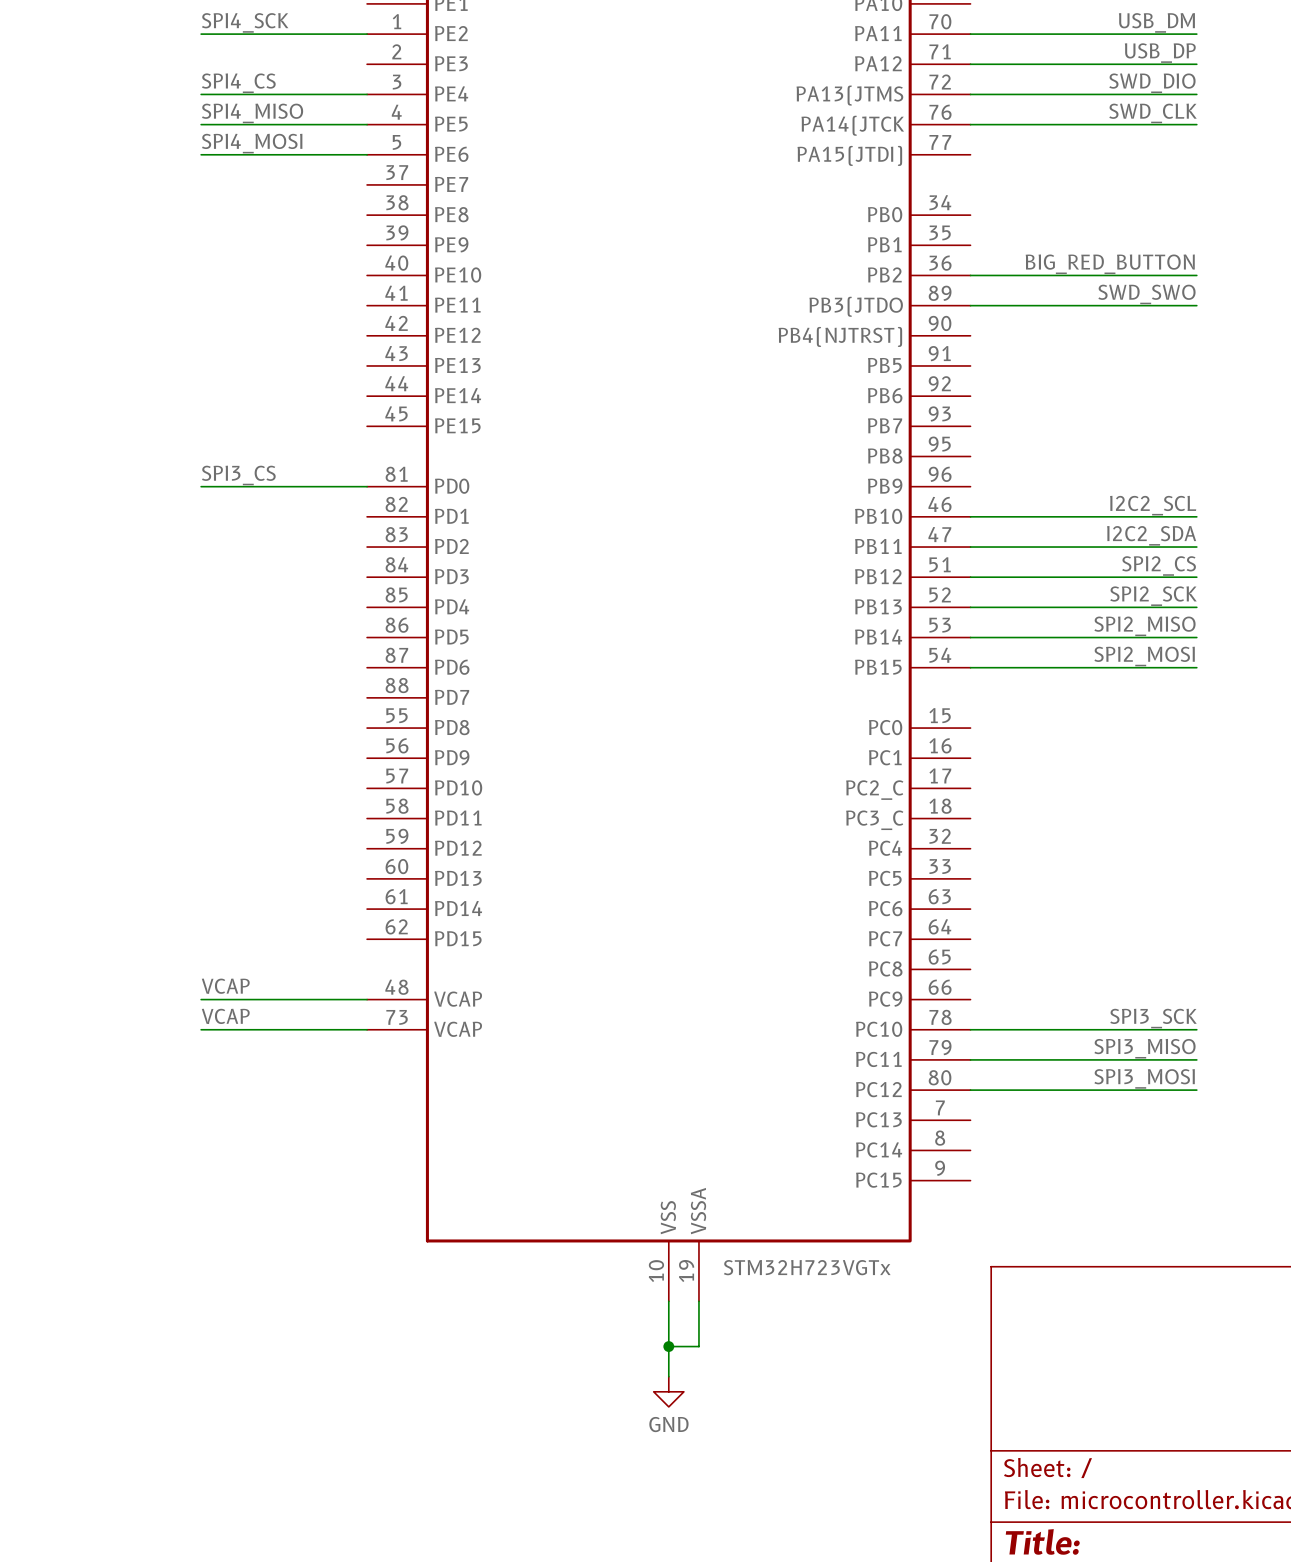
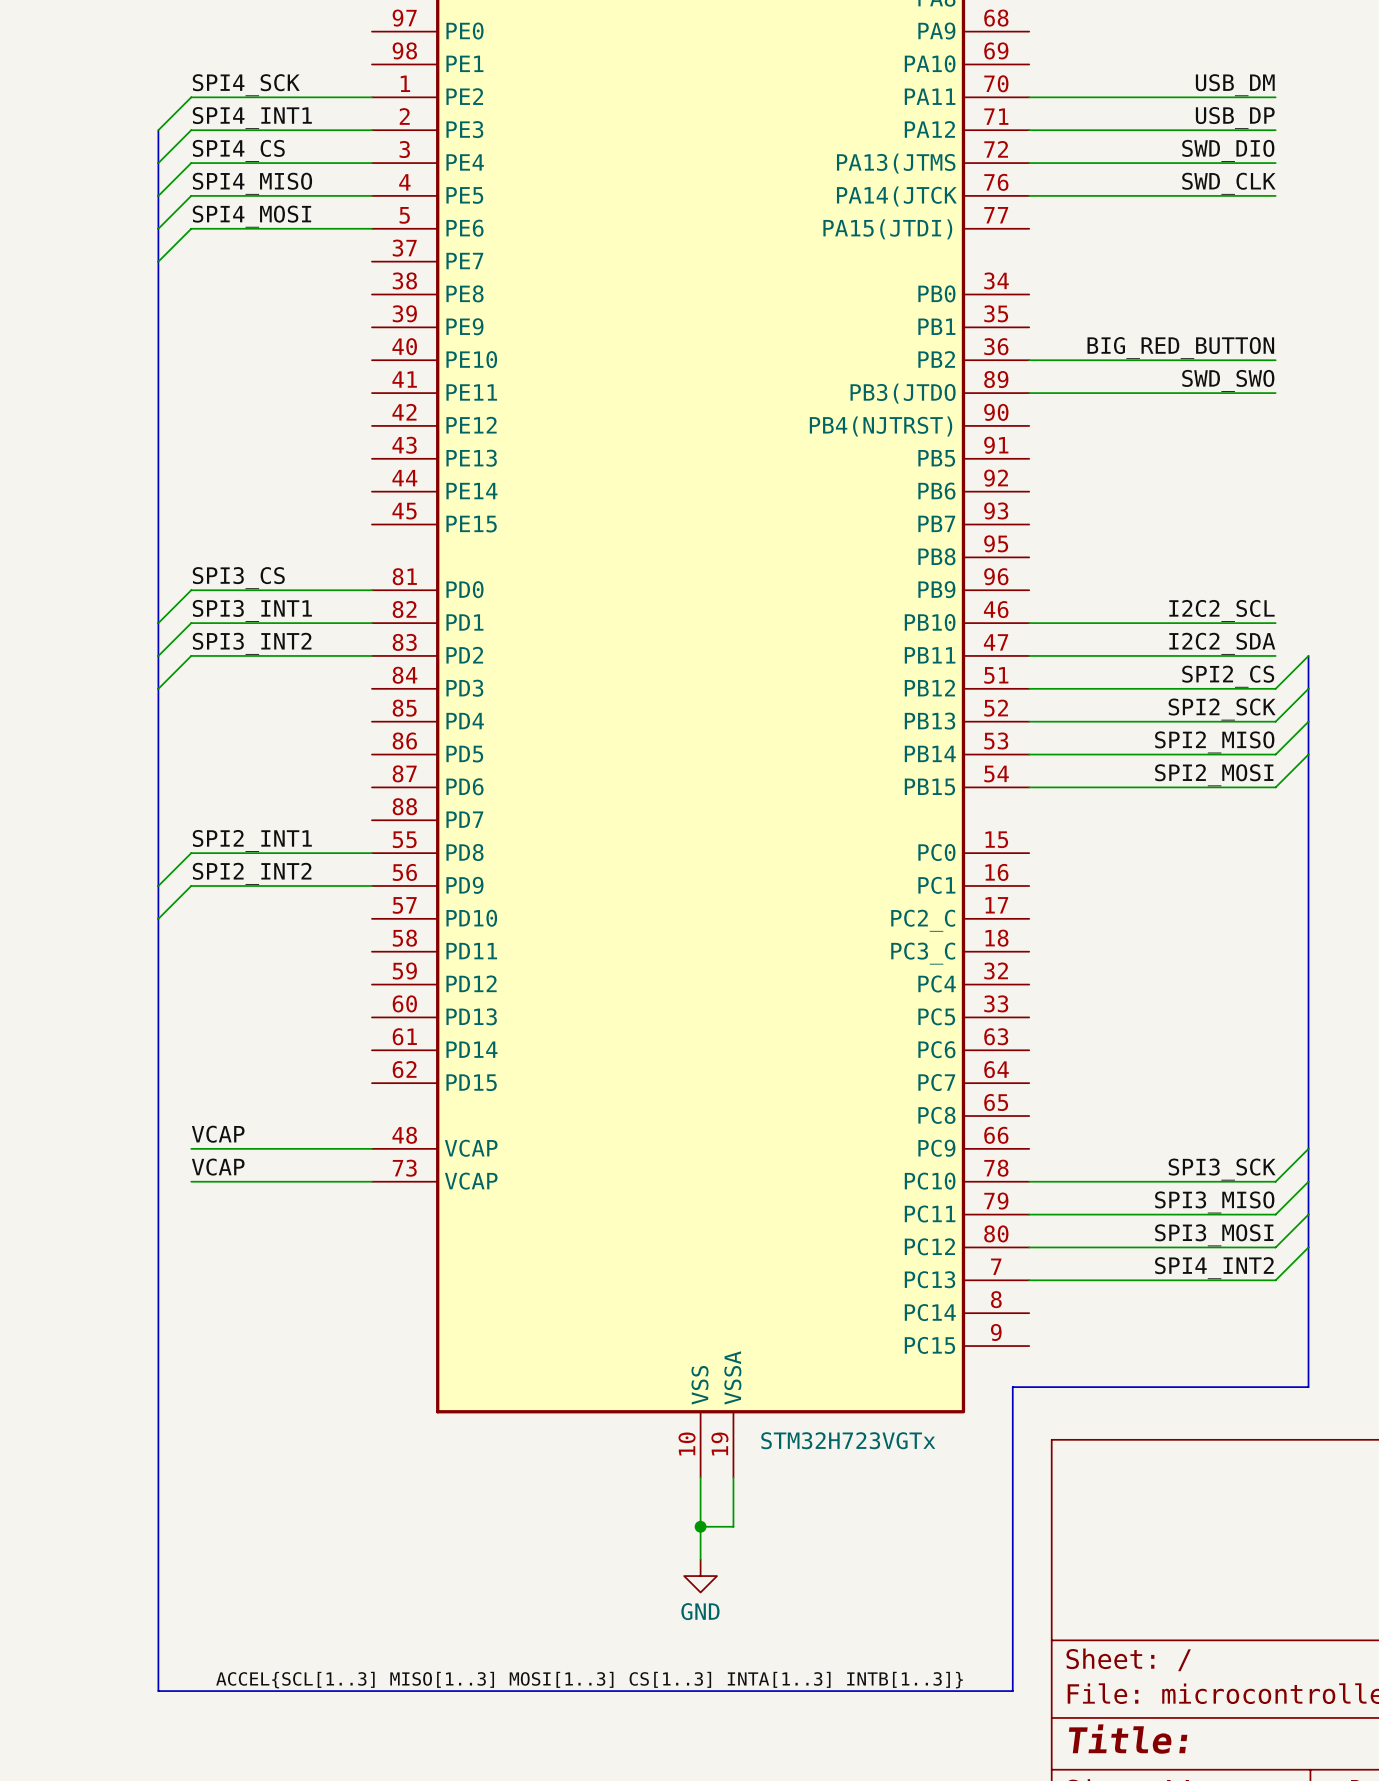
wire: none -> (191, 97) (158, 130)
label: none -> SPI4_INT1 (252, 118)
bus: none -> (158, 130) (158, 1691) (1012, 1691) (1012, 1387) (1308, 1387) (1308, 655)
wire: none -> (371, 130) (191, 130) (158, 163)
wire: none -> (191, 163) (158, 195)
wire: none -> (191, 195) (158, 228)
wire: none -> (191, 228) (158, 261)
wire: none -> (191, 590) (158, 623)
label: none -> SPI3_INT1 (252, 610)
wire: none -> (371, 623) (191, 623) (158, 655)
label: none -> SPI3_INT2 (252, 643)
wire: none -> (371, 655) (191, 655) (158, 688)
wire: none -> (1308, 655) (1275, 688)
wire: none -> (1308, 688) (1275, 721)
wire: none -> (1308, 721) (1275, 754)
wire: none -> (1308, 754) (1275, 787)
label: none -> SPI2_INT1 (252, 840)
wire: none -> (371, 853) (191, 853) (158, 885)
label: none -> SPI2_INT2 (252, 873)
wire: none -> (371, 885) (191, 885) (158, 918)
wire: none -> (1308, 1148) (1275, 1181)
wire: none -> (1308, 1181) (1275, 1214)
wire: none -> (1308, 1214) (1275, 1247)
wire: none -> (1308, 1247) (1275, 1280) (1029, 1280)
label: none -> SPI4_INT2 (1214, 1268)
label: none -> ACCEL{SCL[1..3] MISO[1..3] MOSI[1..3] CS[1..3] INTA[1..3] INTB[1..3]} (589, 1680)

